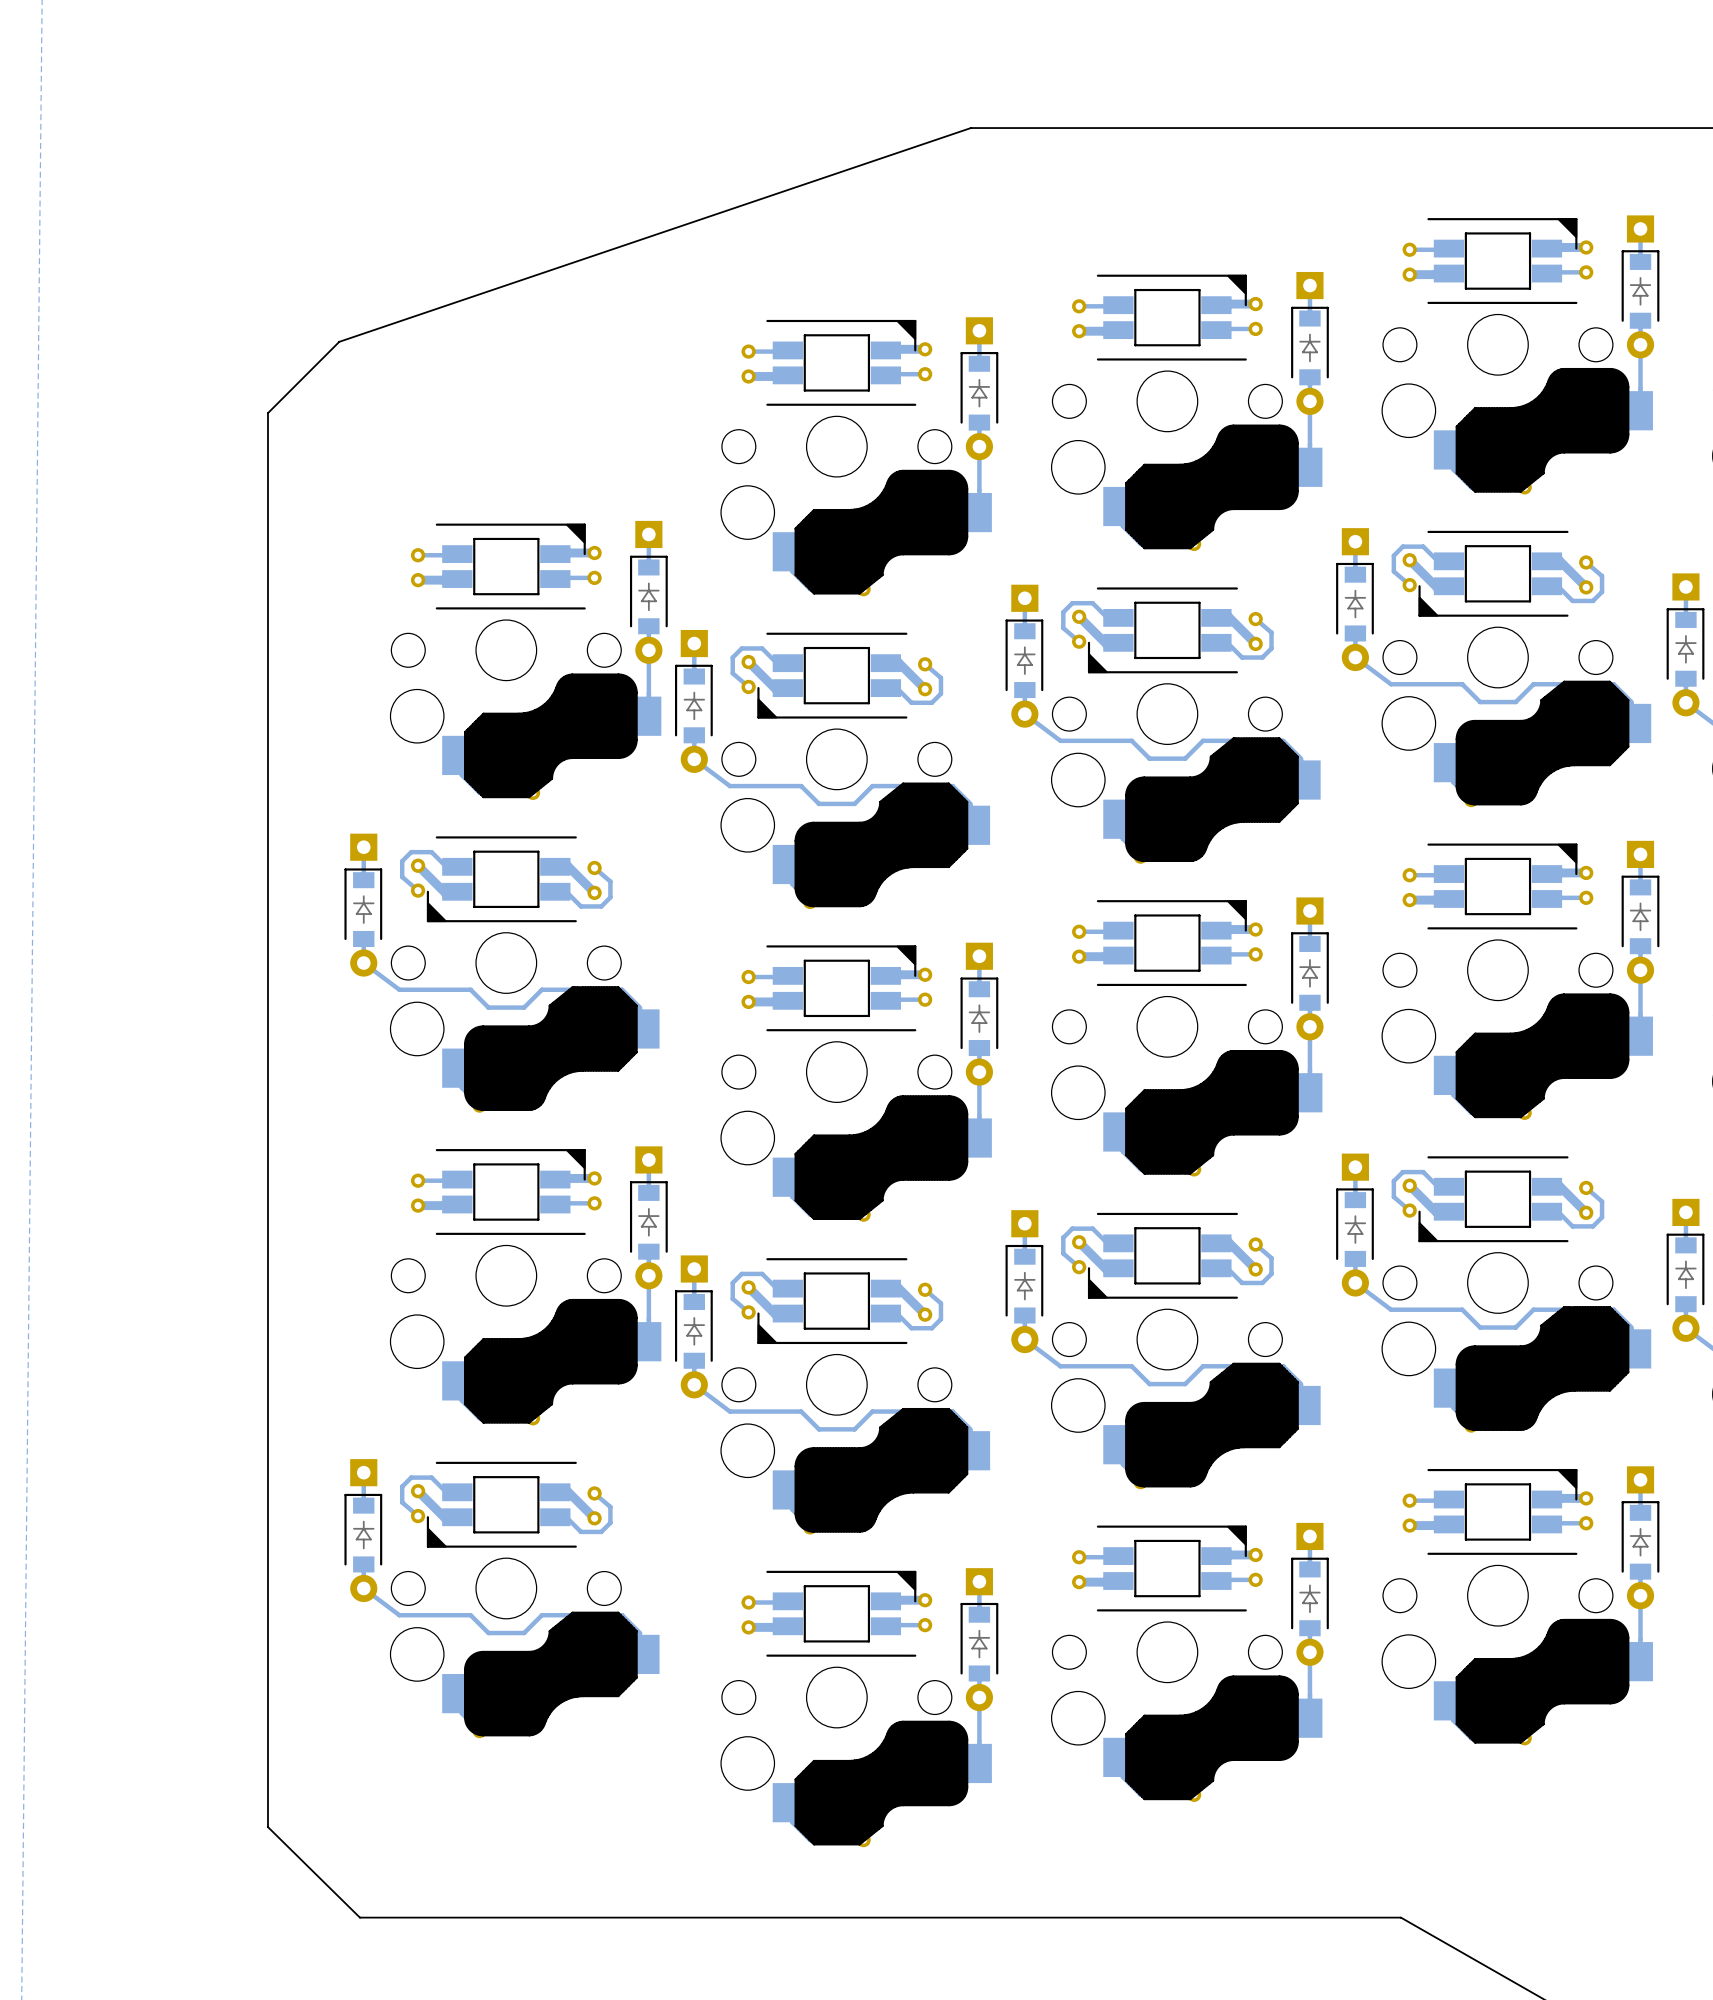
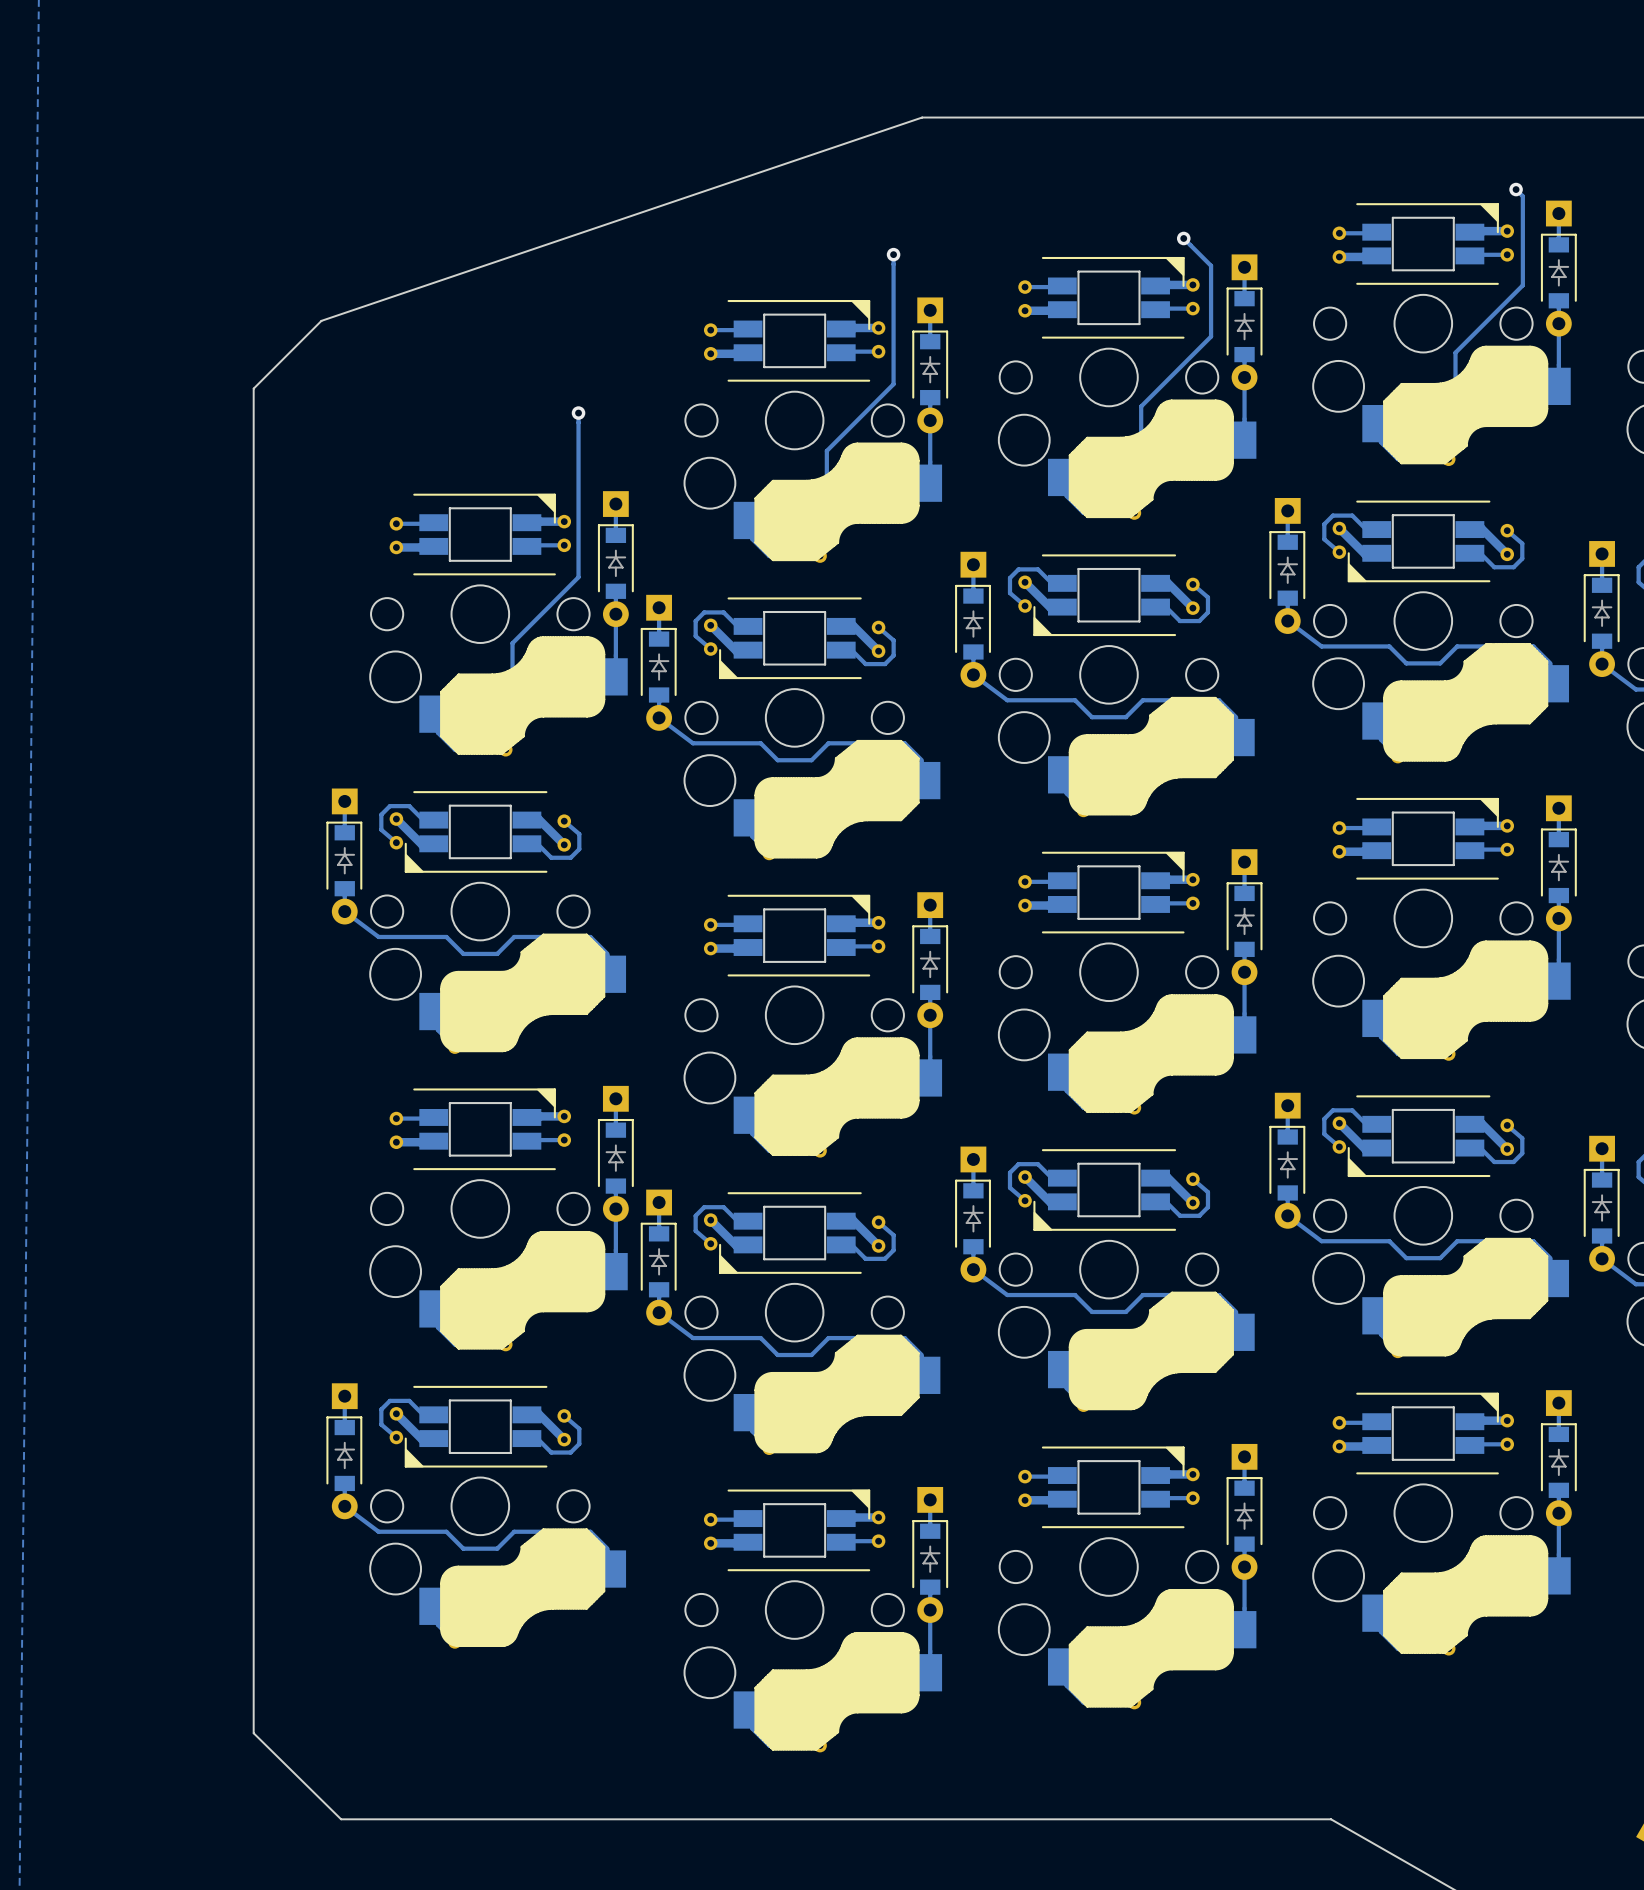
track: none -> (1516, 189) (1522, 196) (1522, 285) (1455, 352) (1455, 452) (1448, 459)
via: none -> (1516, 189)
track: none -> (1183, 238) (1211, 265) (1211, 336) (1141, 406) (1141, 506) (1134, 513)
via: none -> (1183, 238)
track: none -> (893, 254) (893, 384) (826, 450) (826, 549) (820, 556)
via: none -> (893, 254)
track: none -> (578, 413) (578, 577) (512, 643) (512, 742) (505, 749)
via: none -> (578, 413)

